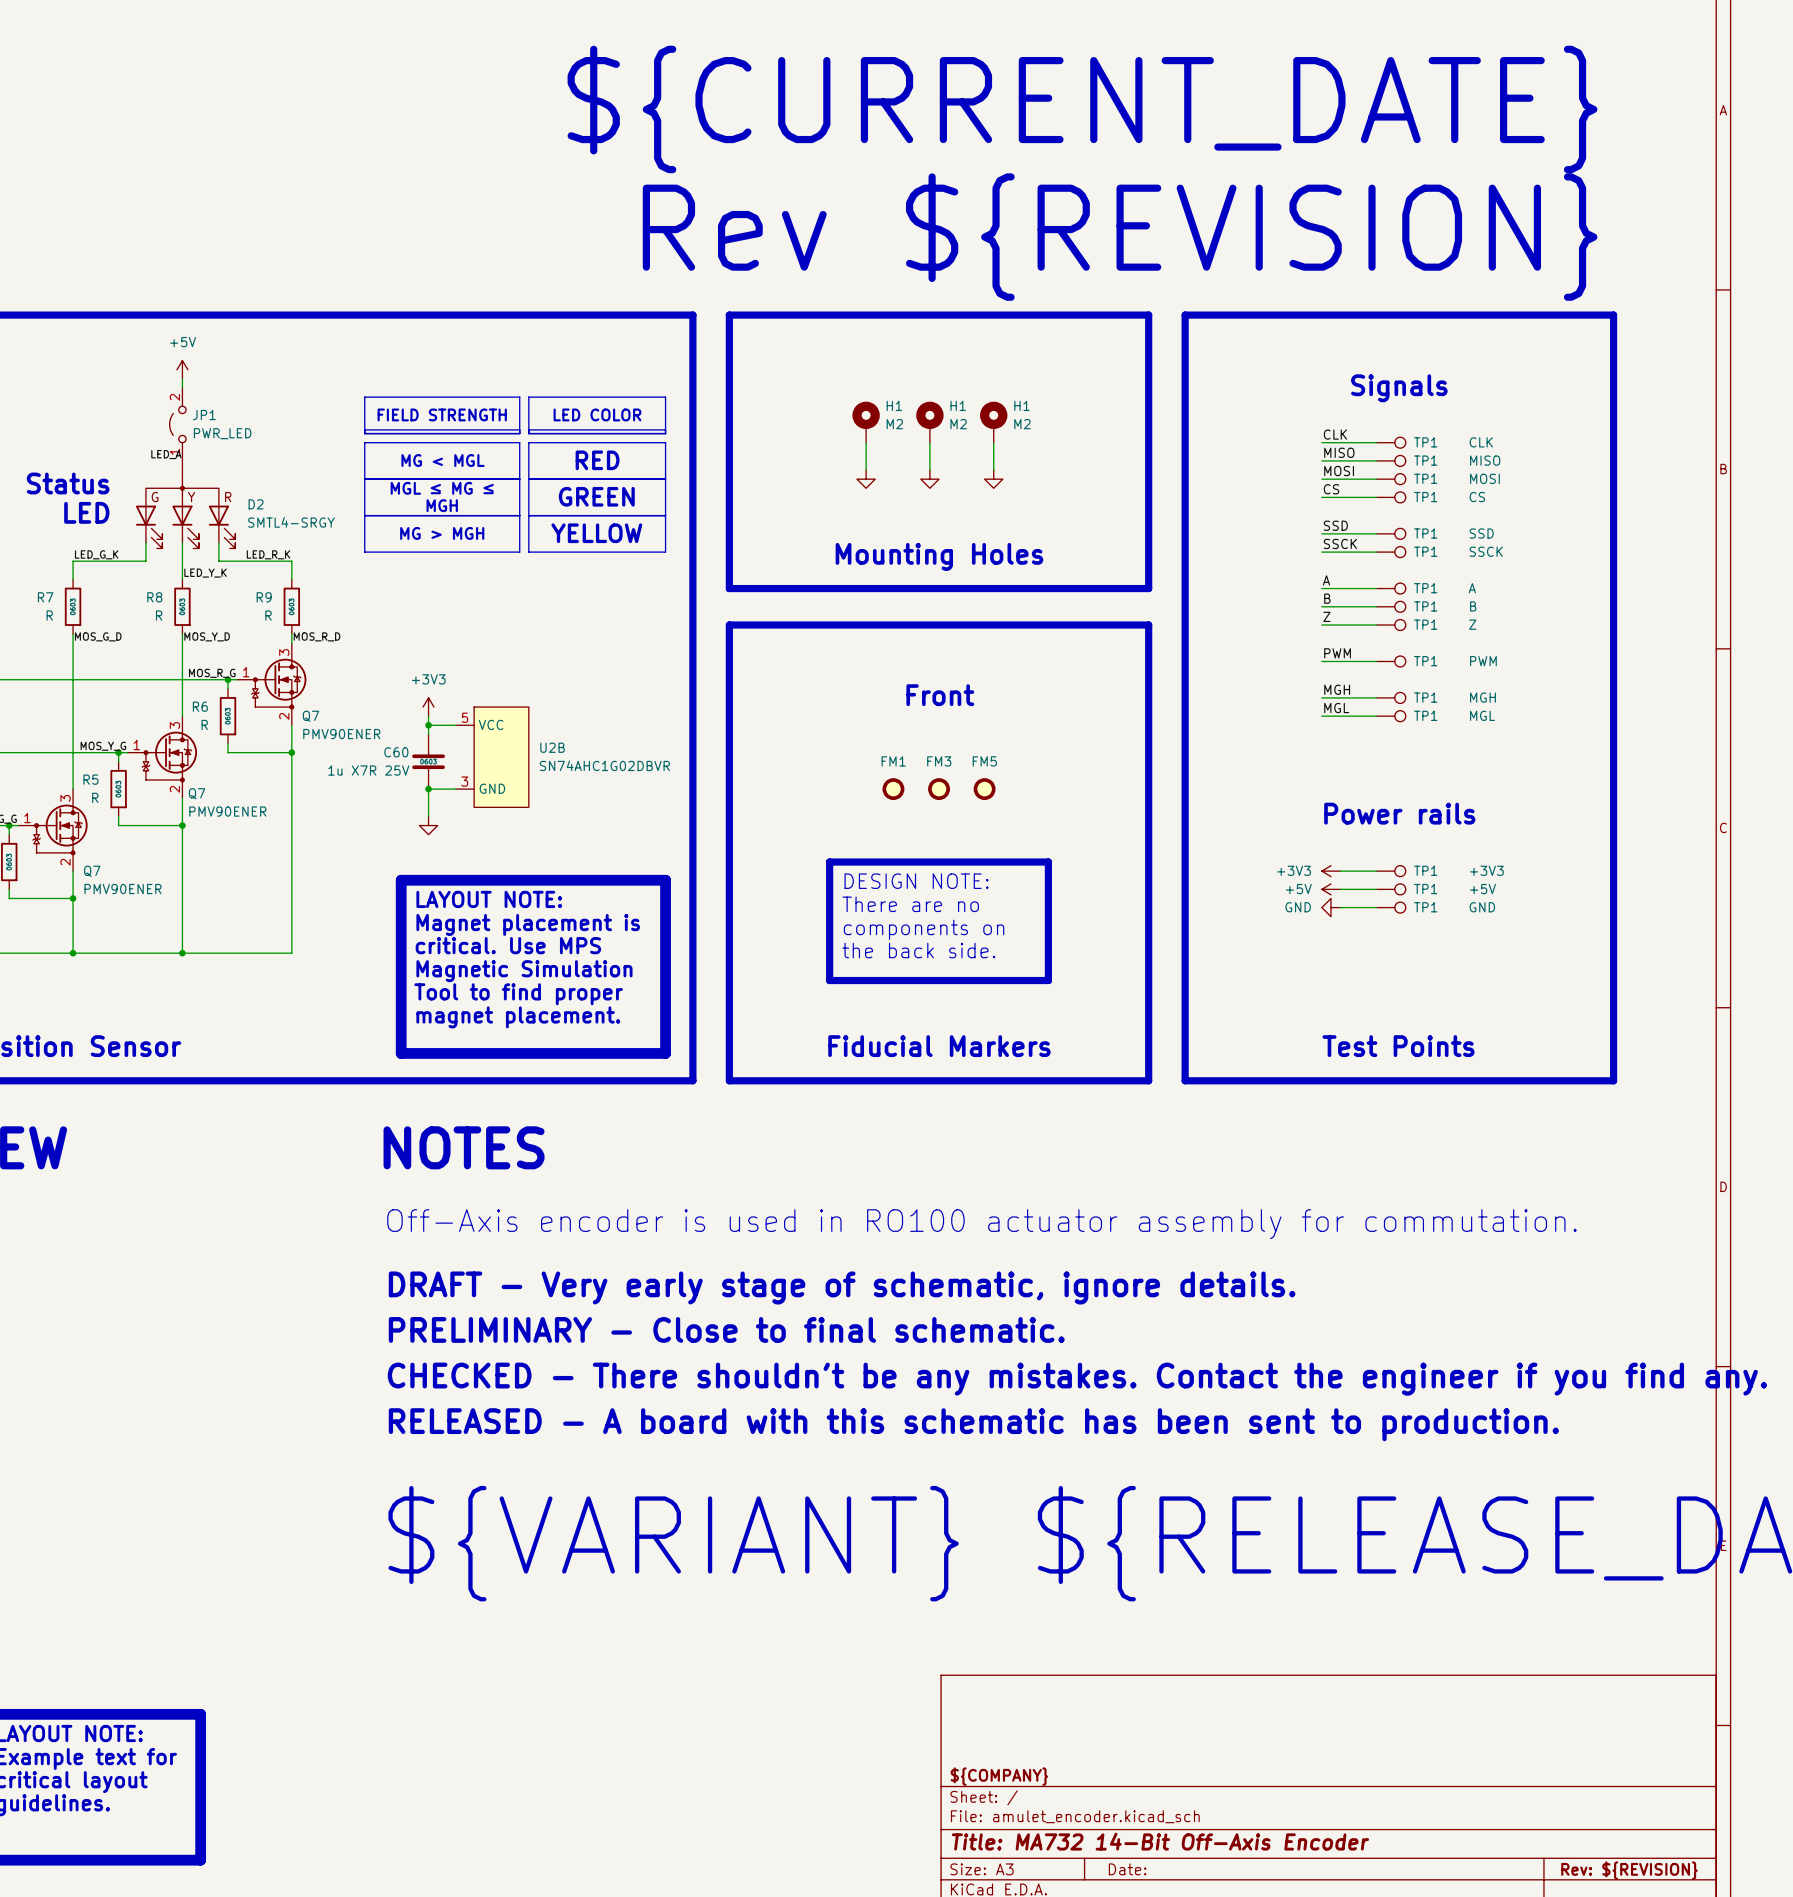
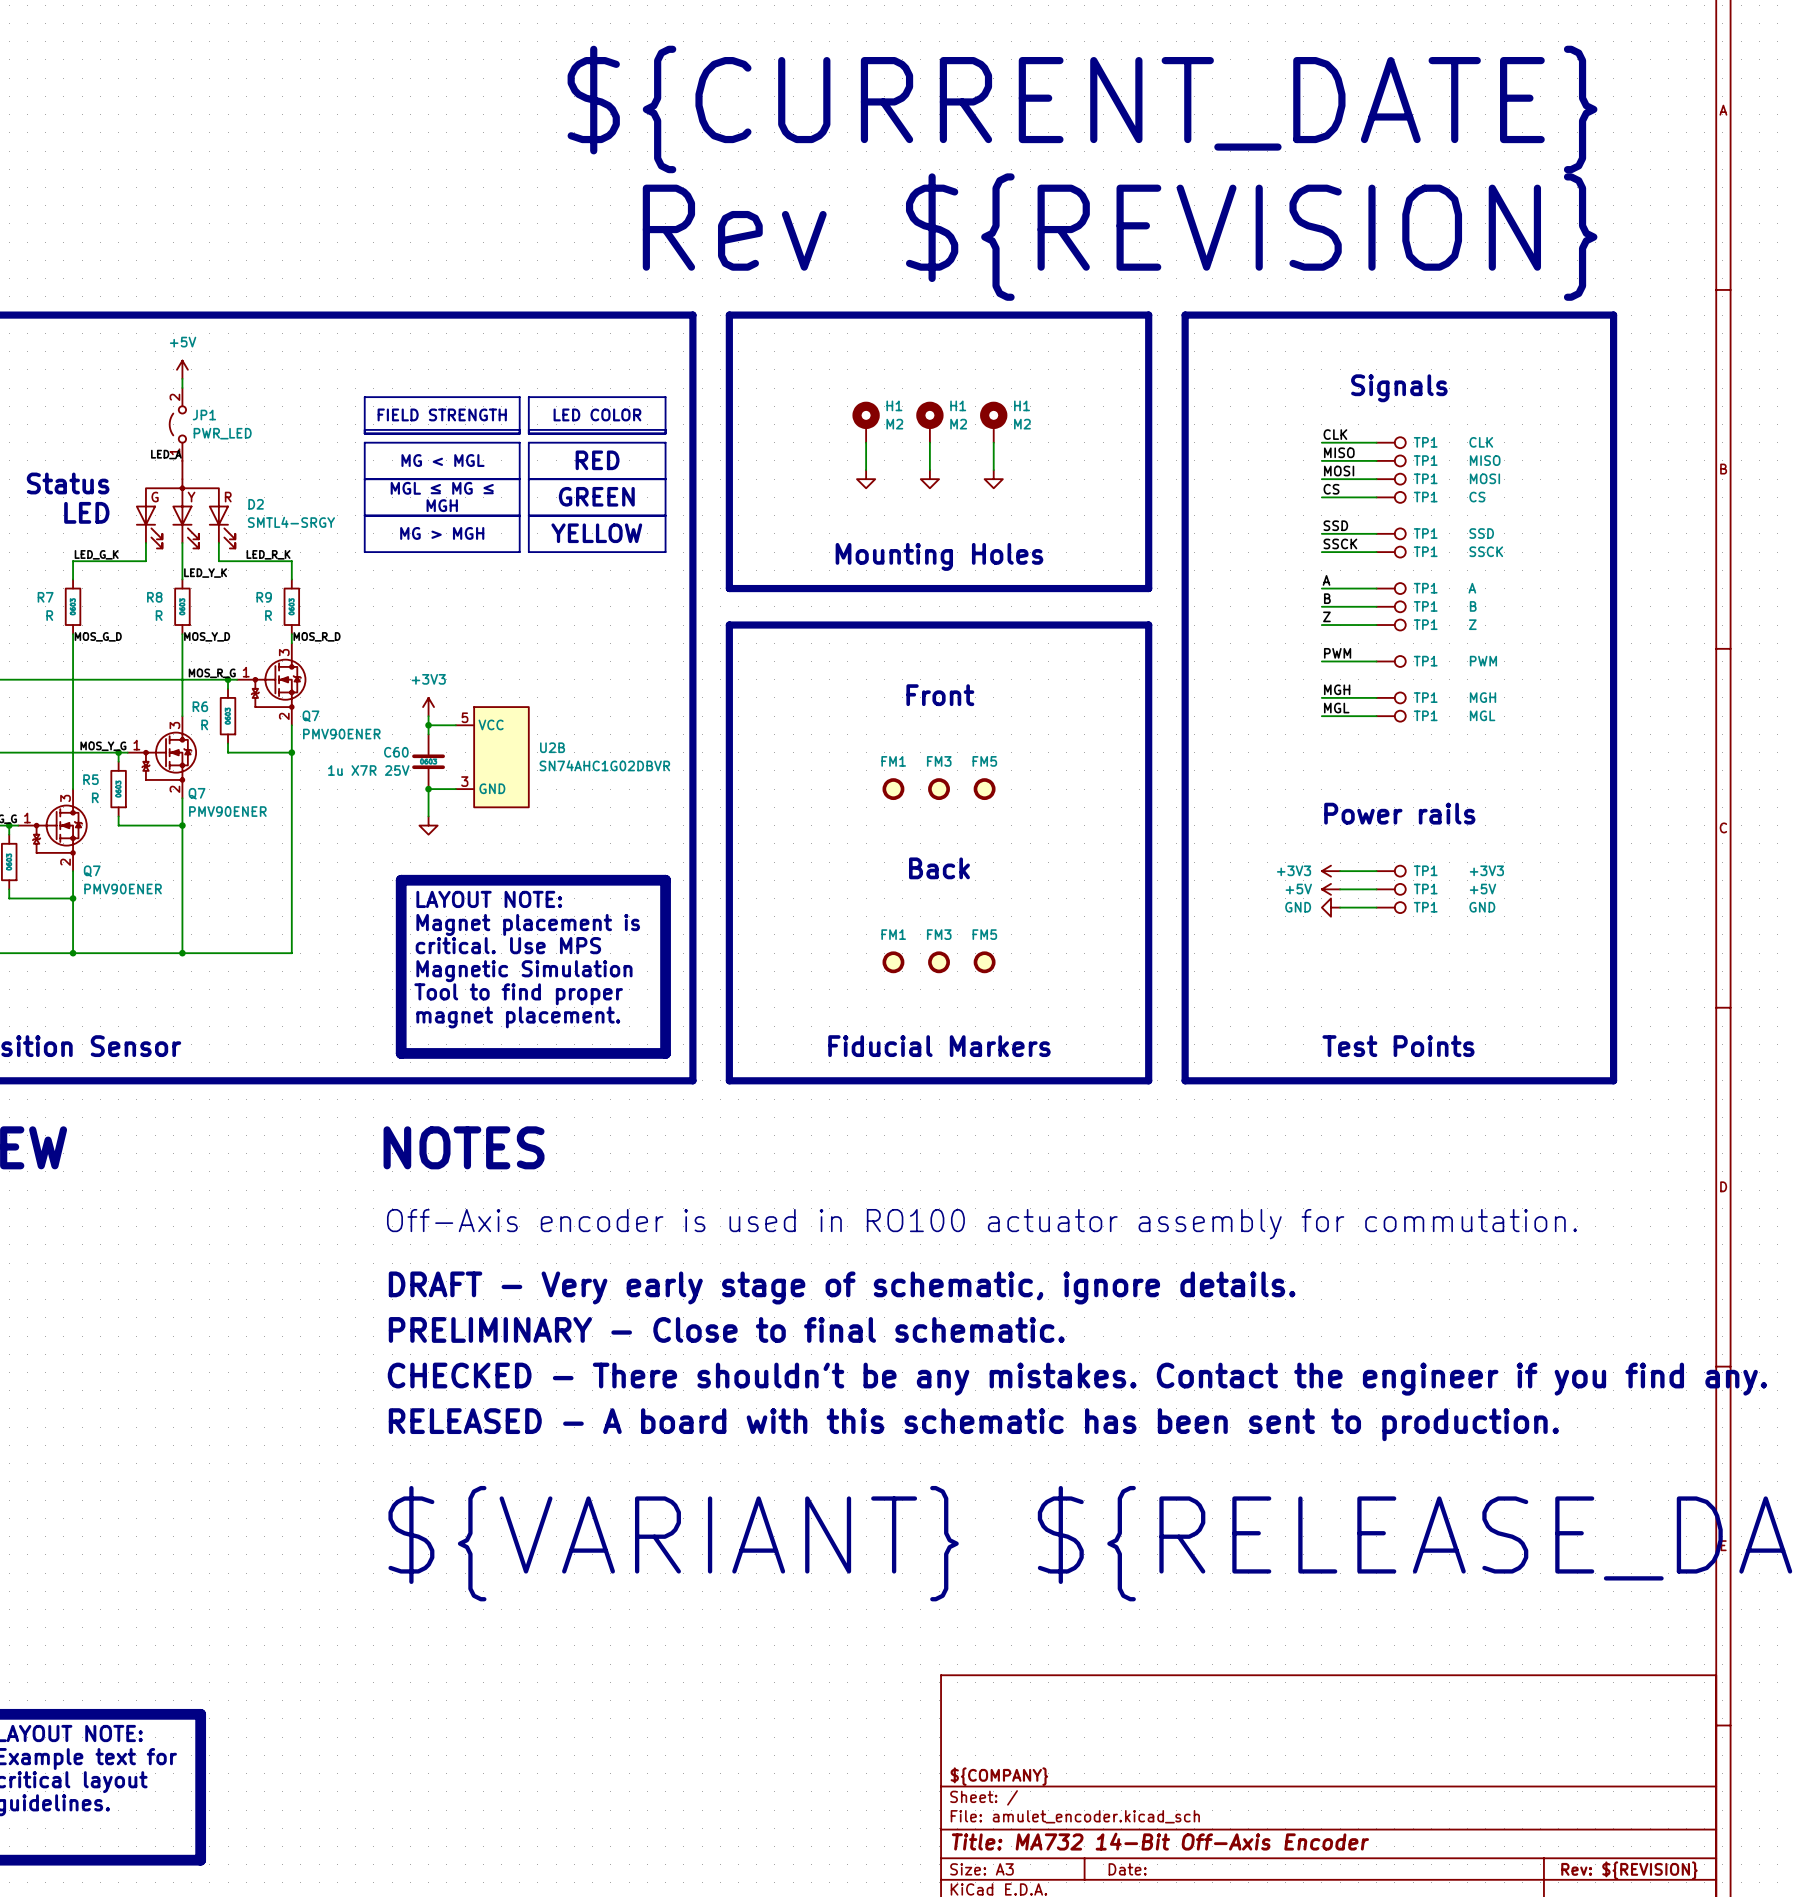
line: (829, 862) (1048, 862) (1048, 980) (829, 980) (829, 862) -> none
text: none -> Back (939, 868)
text: DESIGN NOTE: (916, 881) -> none
text: There are no (910, 904) -> none
text: components on (924, 929) -> none
text: the back side. (918, 950) -> none
FM1: none -> (893, 962)
FM3: none -> (939, 962)
FM5: none -> (984, 962)

